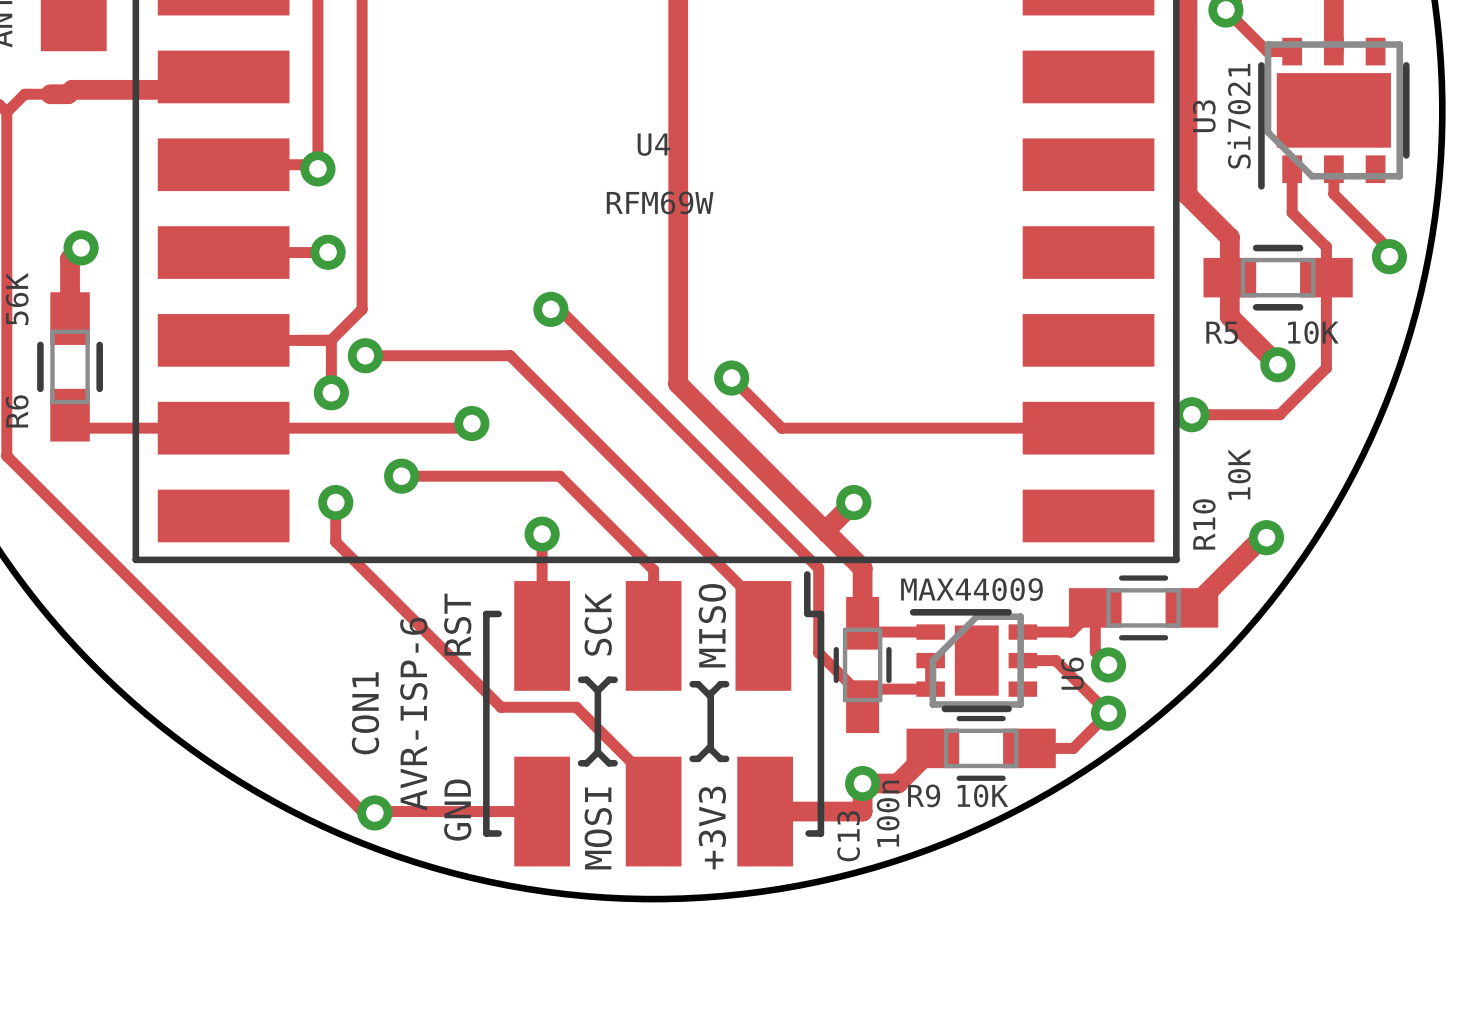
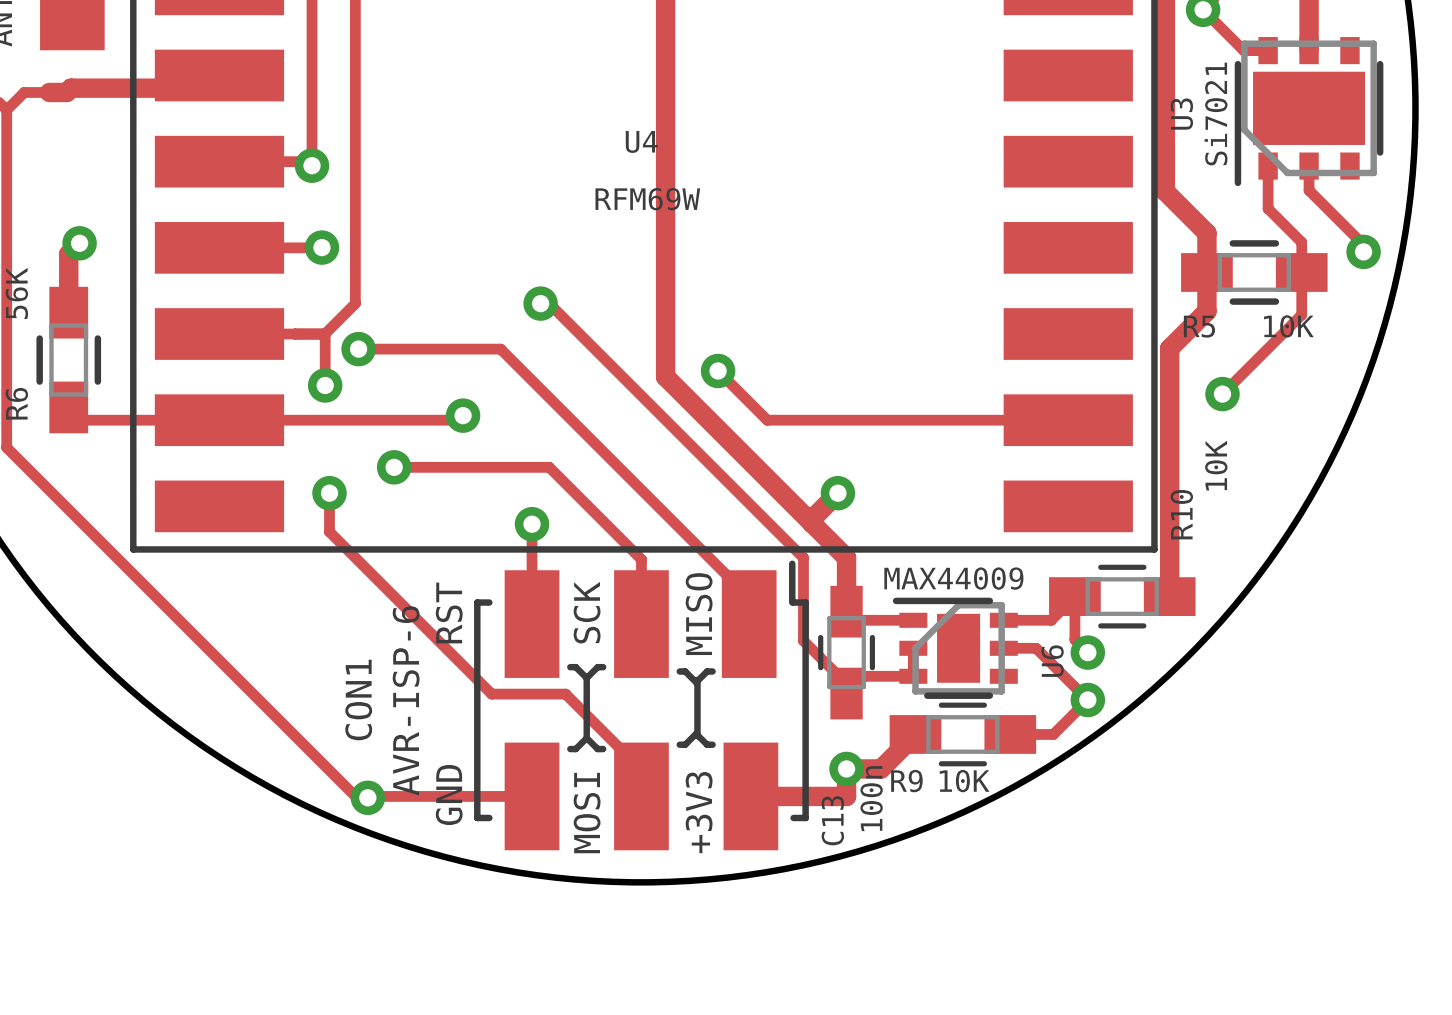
track: (1229, 316) (1277, 364) -> (1206, 311) (1169, 348) (1169, 596) (1176, 596)
track: (1326, 320) (1326, 368) (1279, 414) (1191, 414) -> (1301, 314) (1222, 394)
via: (1277, 364) -> none
via: none -> (1222, 394)
via: (1191, 414) -> none
track: (1266, 537) (1262, 537) (1191, 607) -> none
via: (1266, 537) -> none

